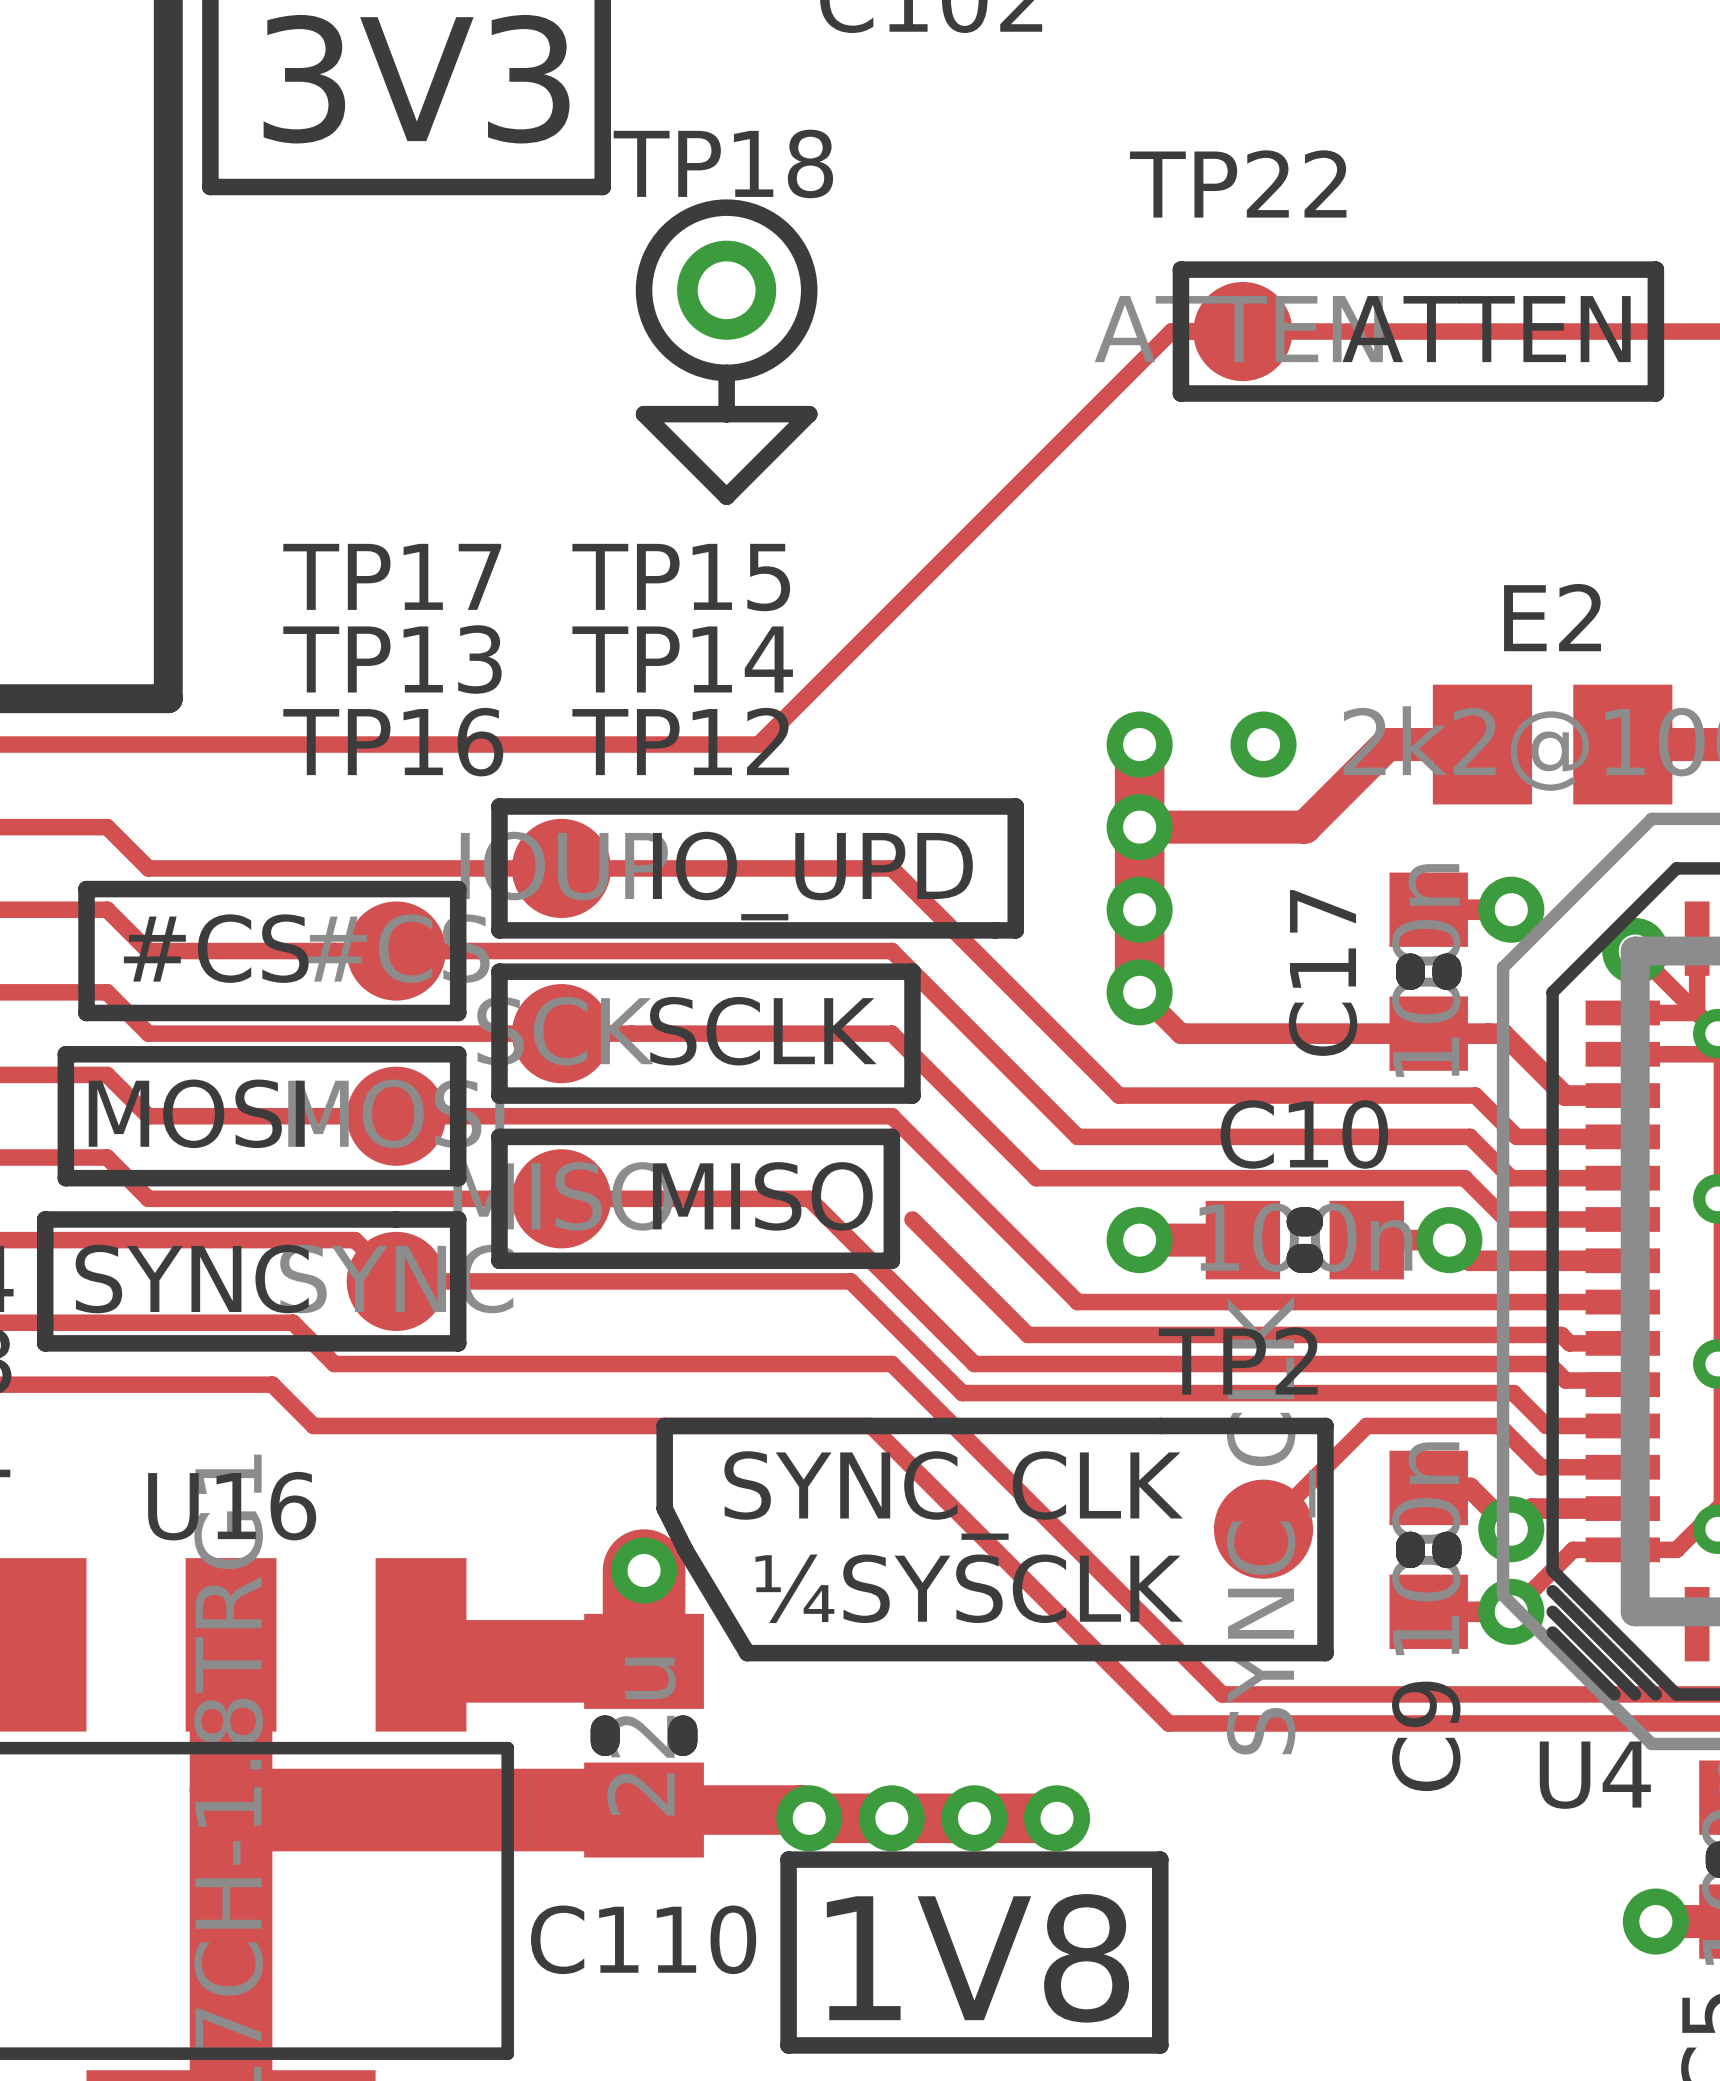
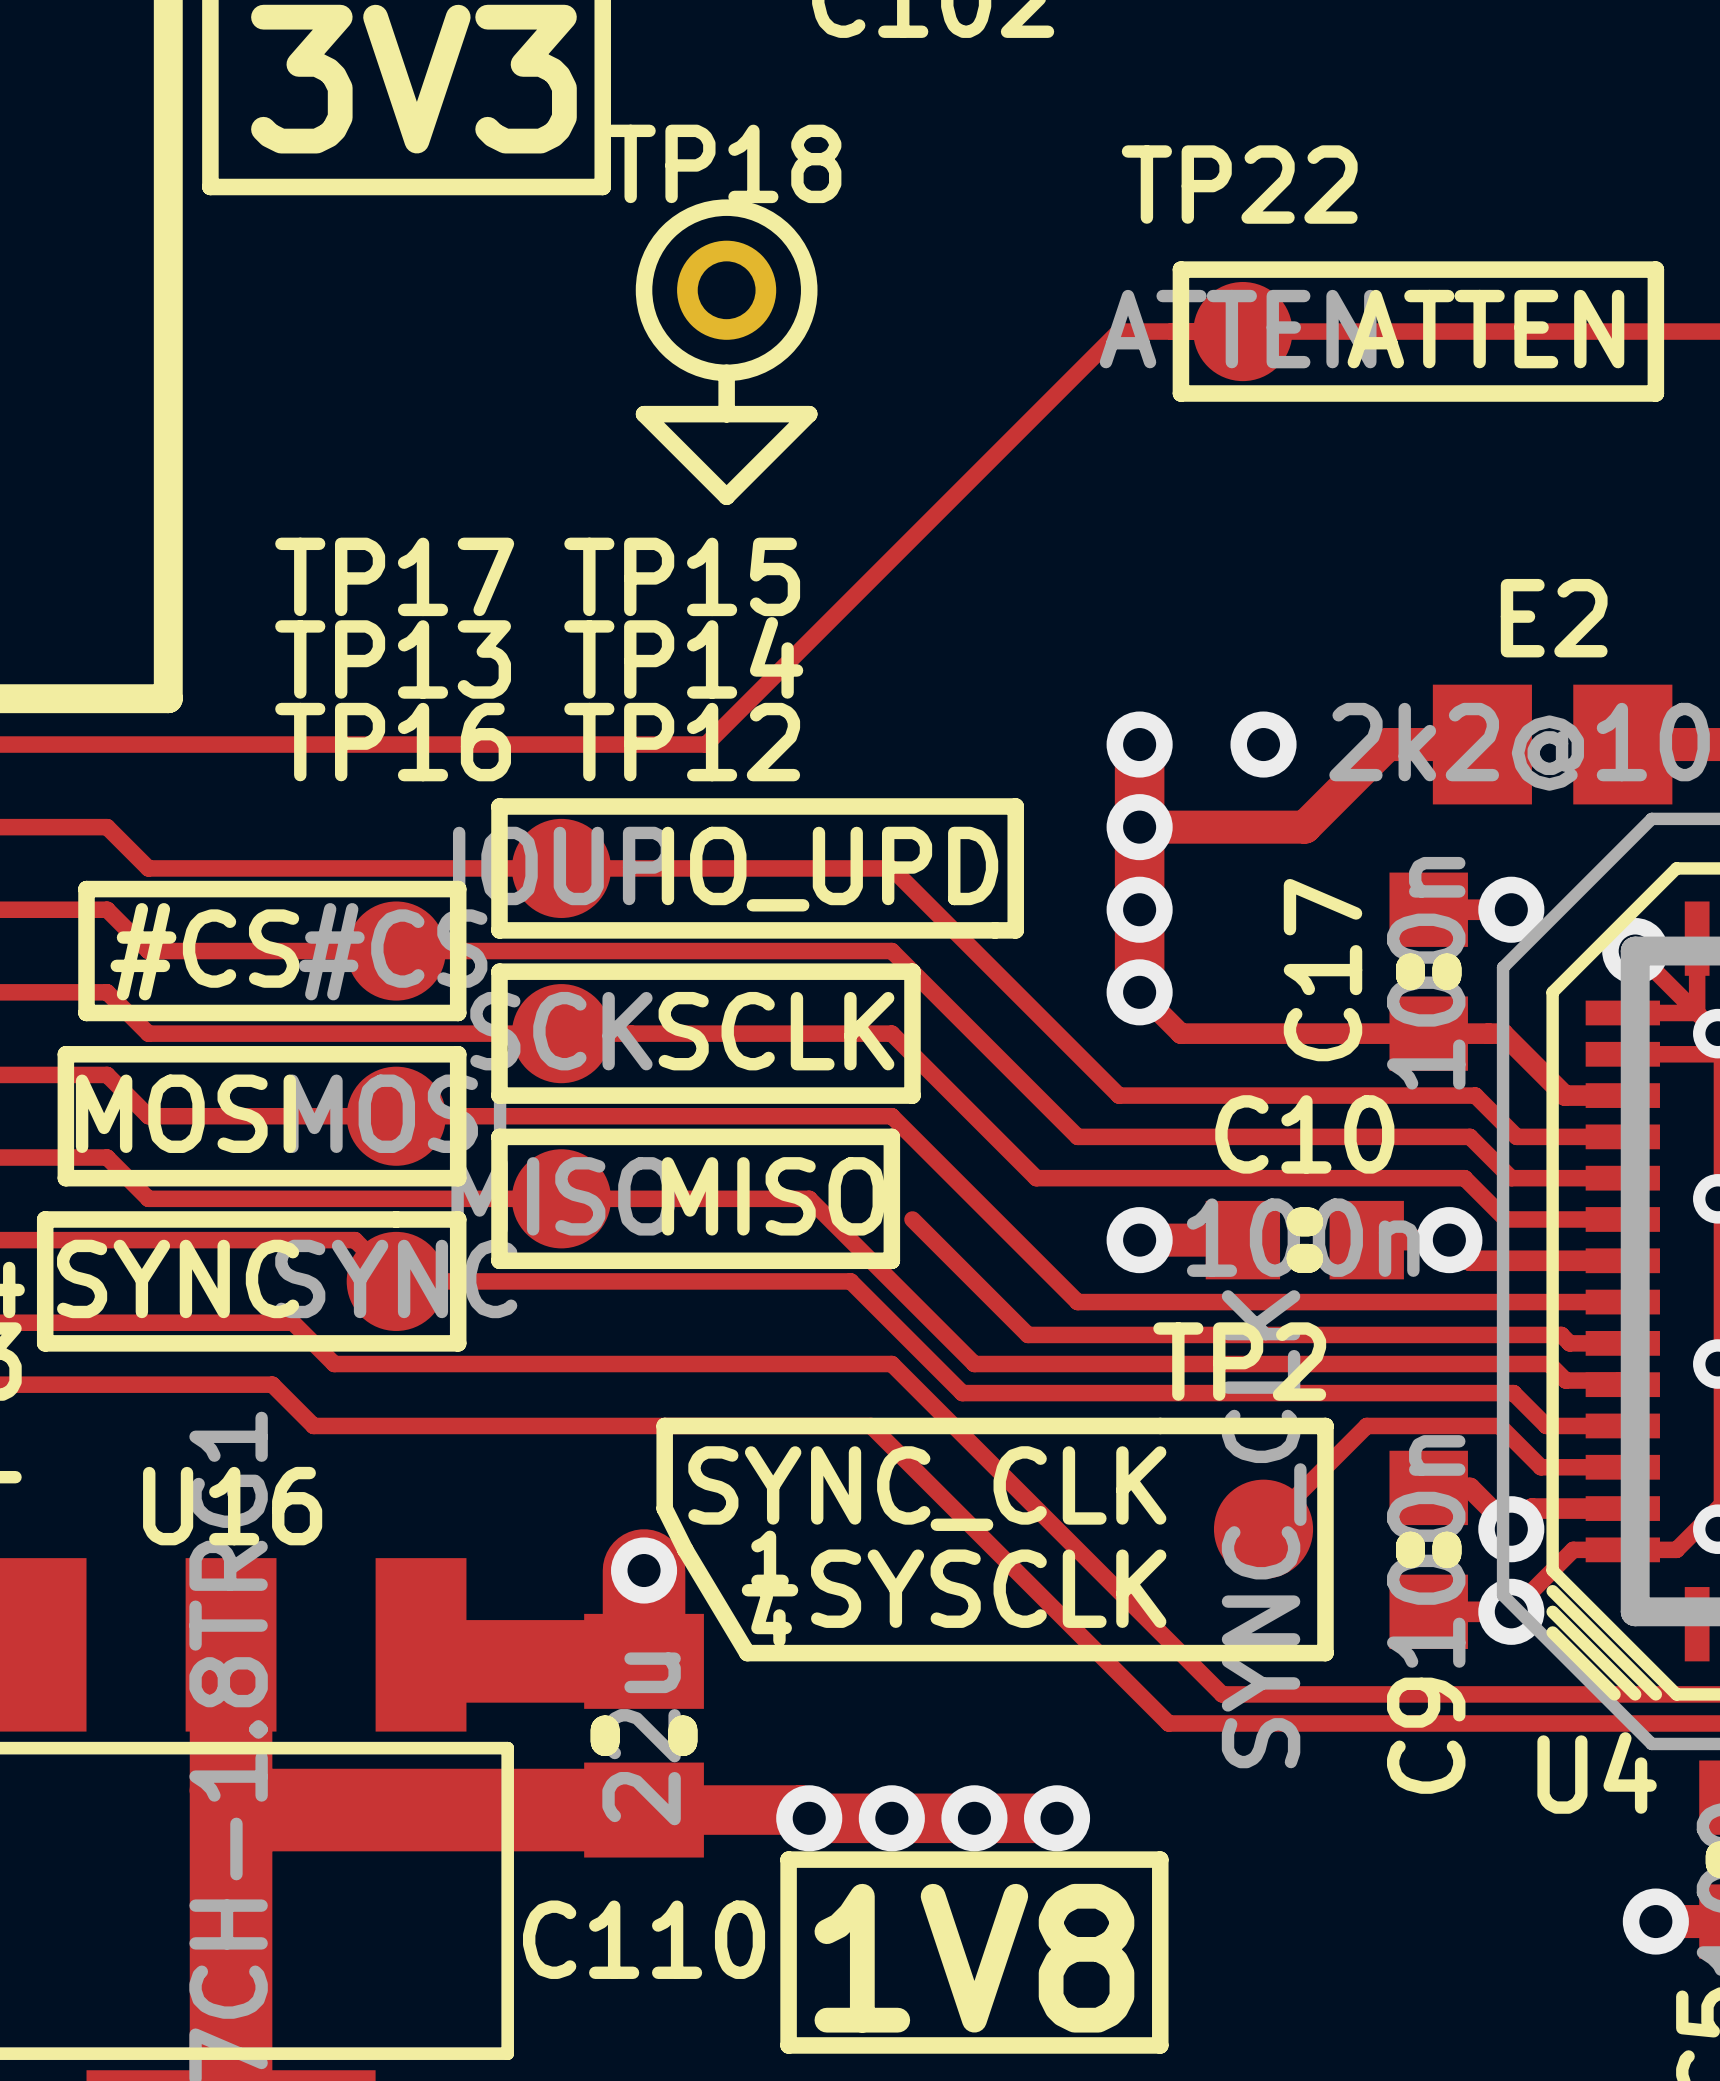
top track: (1171, 331) (758, 744) (705, 744) -> (1171, 331) (1118, 331) (705, 744)

